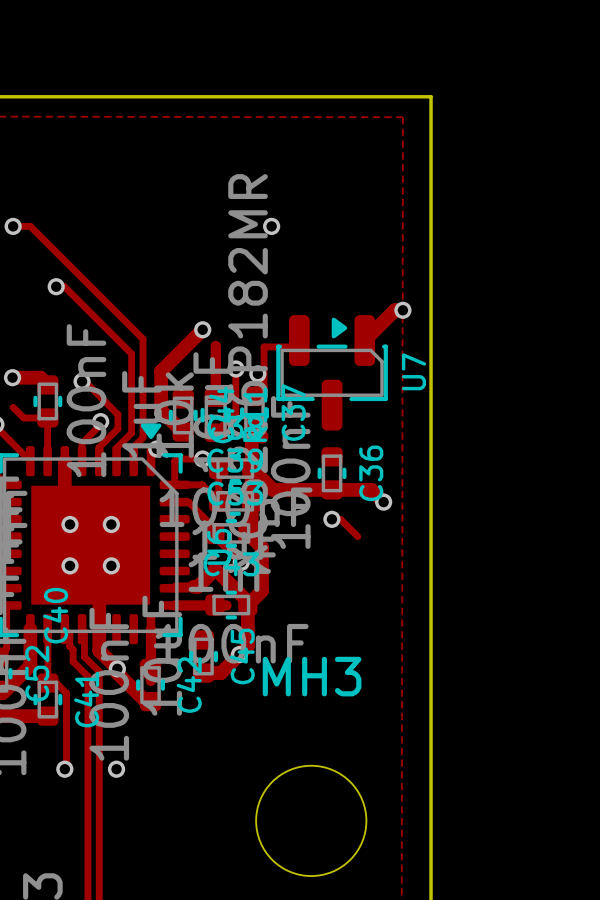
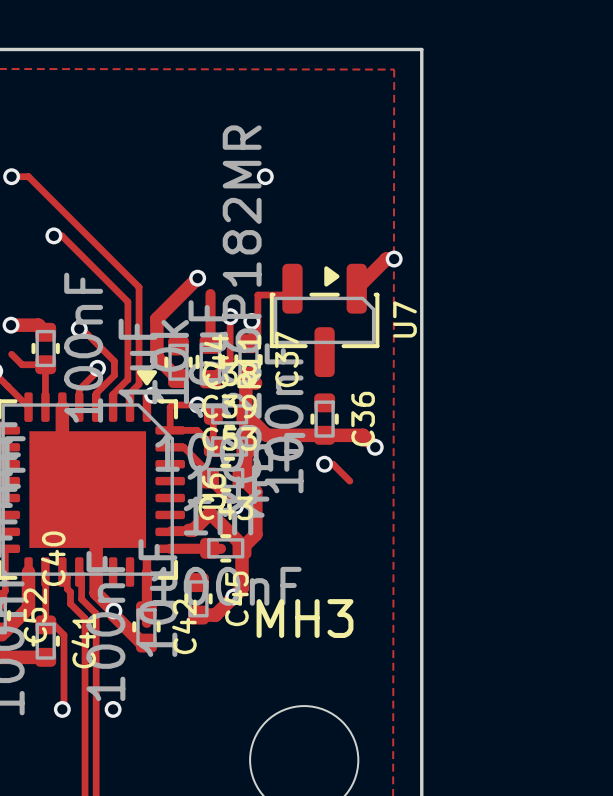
via: (70, 524) -> none
via: (111, 524) -> none
via: (70, 565) -> none
via: (111, 565) -> none

